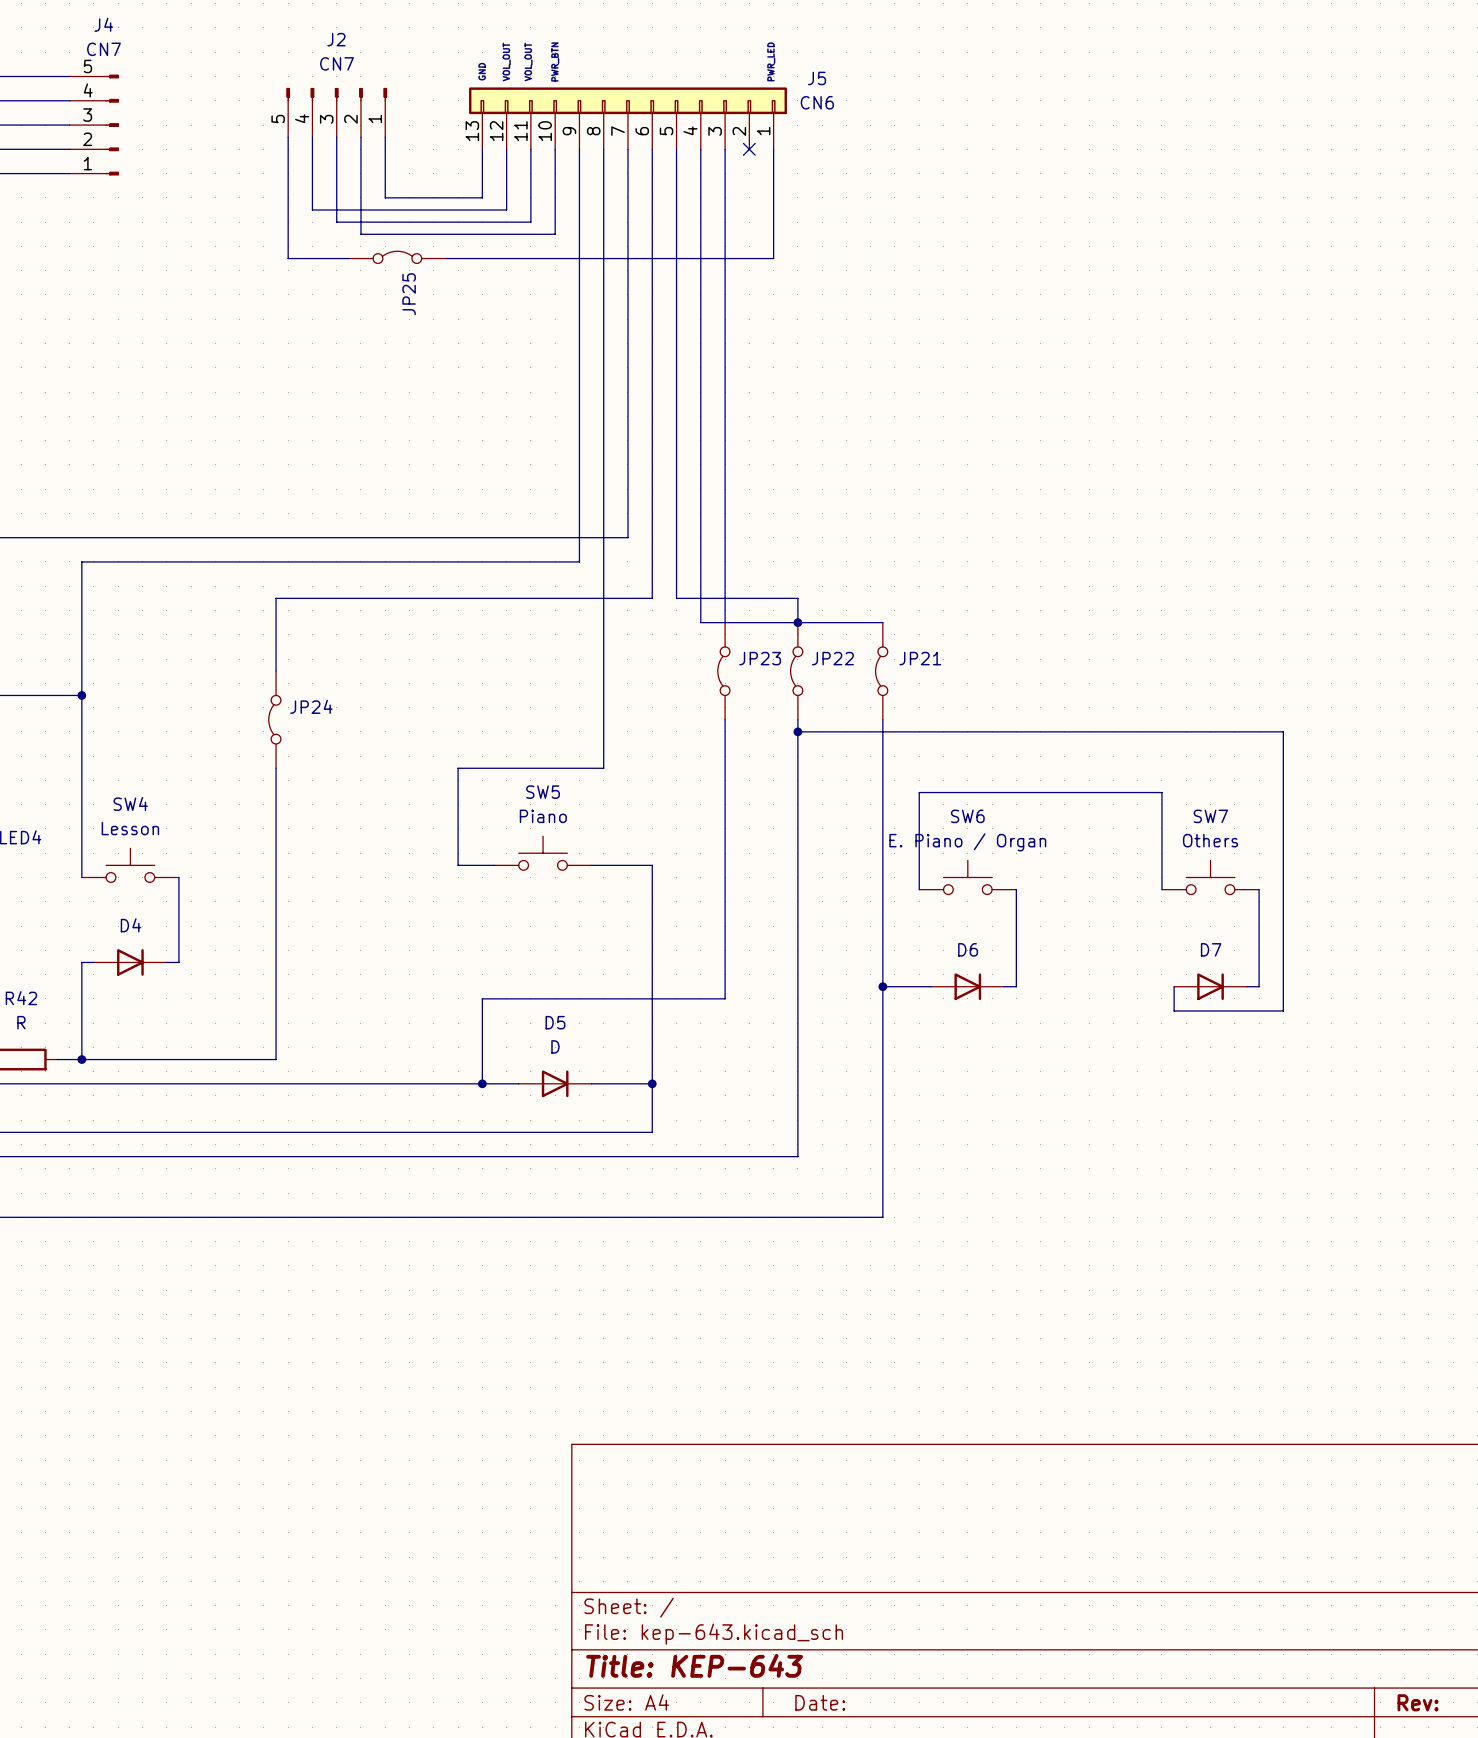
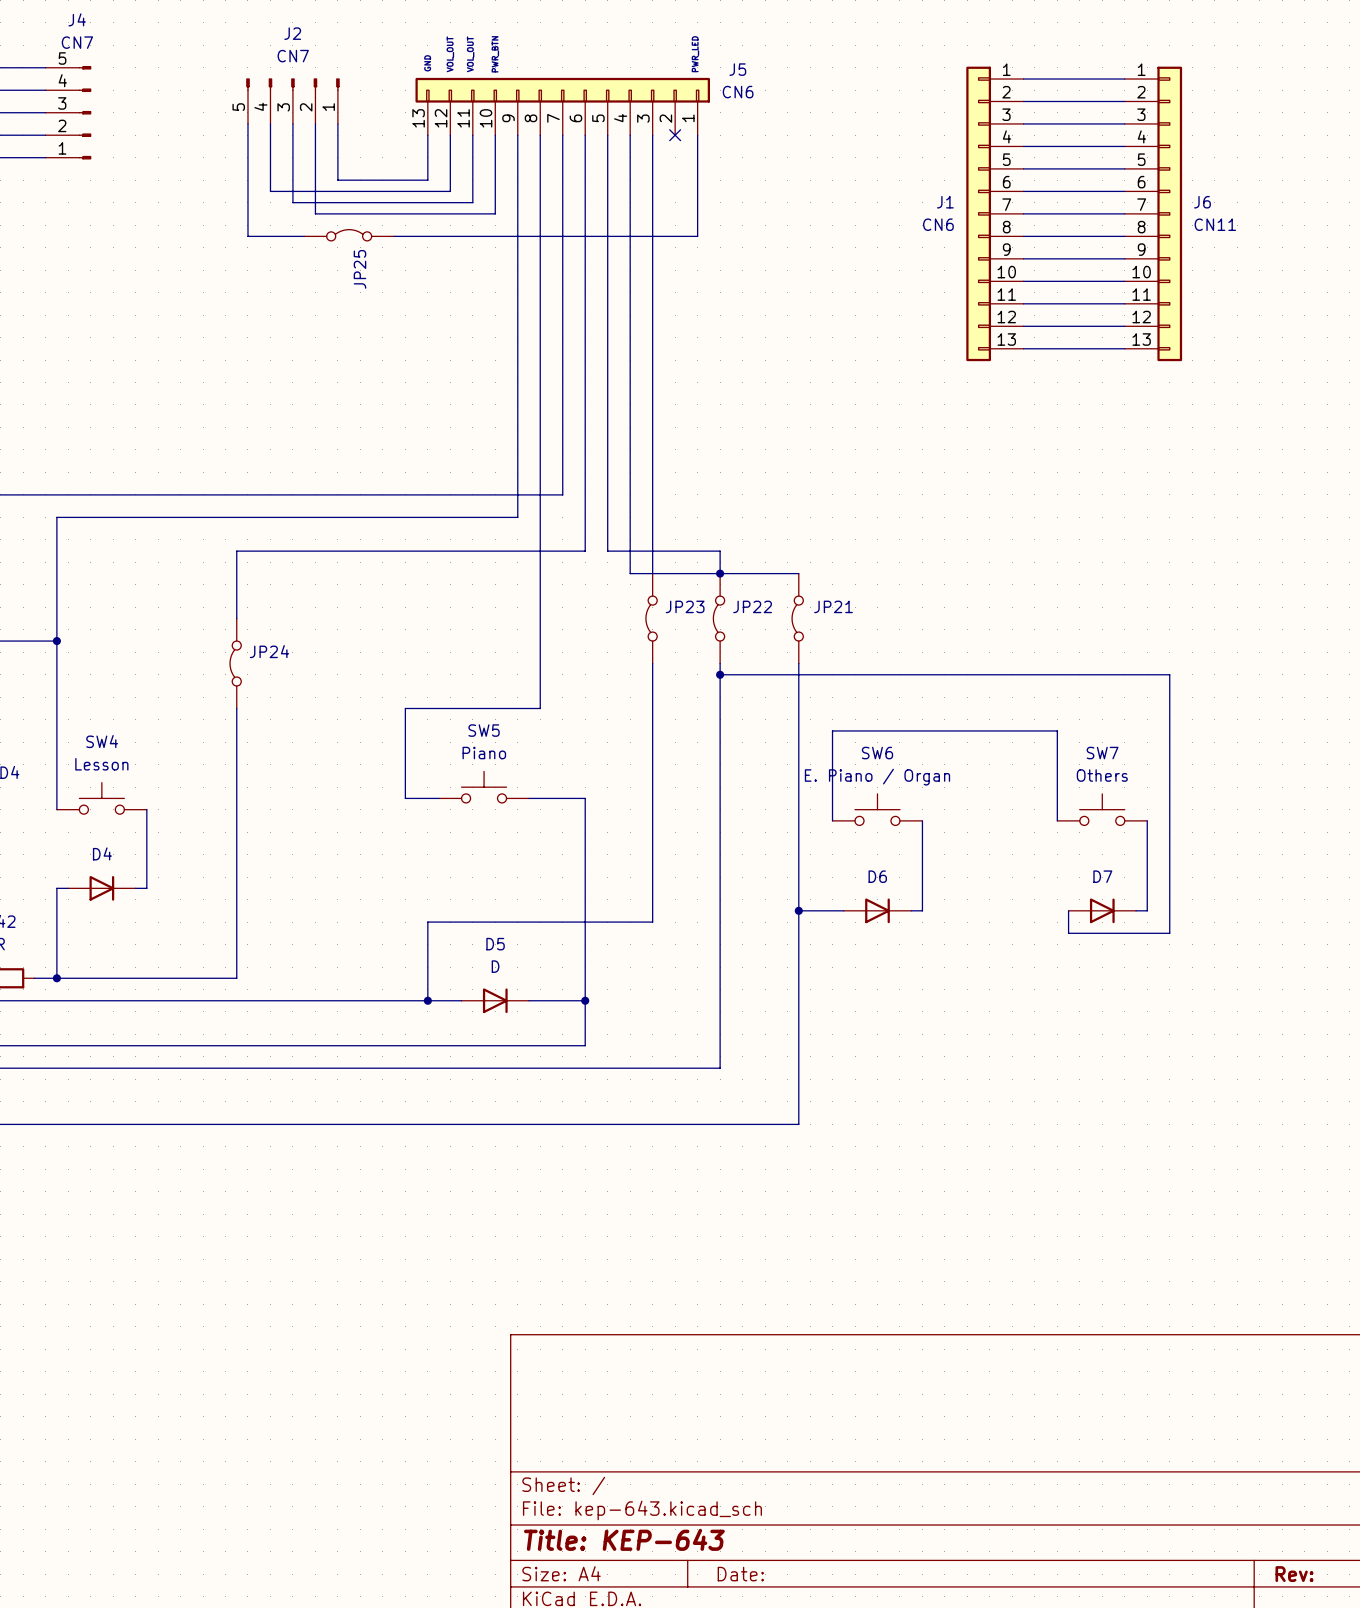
wire: none -> (1023, 79) (1124, 79)
wire: none -> (1023, 101) (1124, 101)
wire: none -> (1023, 123) (1124, 123)
wire: none -> (1023, 146) (1124, 146)
wire: none -> (1023, 168) (1124, 168)
wire: none -> (1023, 191) (1124, 191)
J1: none -> CN6 (994, 213)
wire: none -> (1023, 213) (1124, 213)
J6: none -> CN11 (1153, 213)
wire: none -> (1023, 236) (1124, 236)
wire: none -> (1023, 258) (1124, 258)
wire: none -> (1023, 281) (1124, 281)
wire: none -> (1023, 303) (1124, 303)
wire: none -> (1023, 326) (1124, 326)
wire: none -> (1023, 348) (1124, 348)

